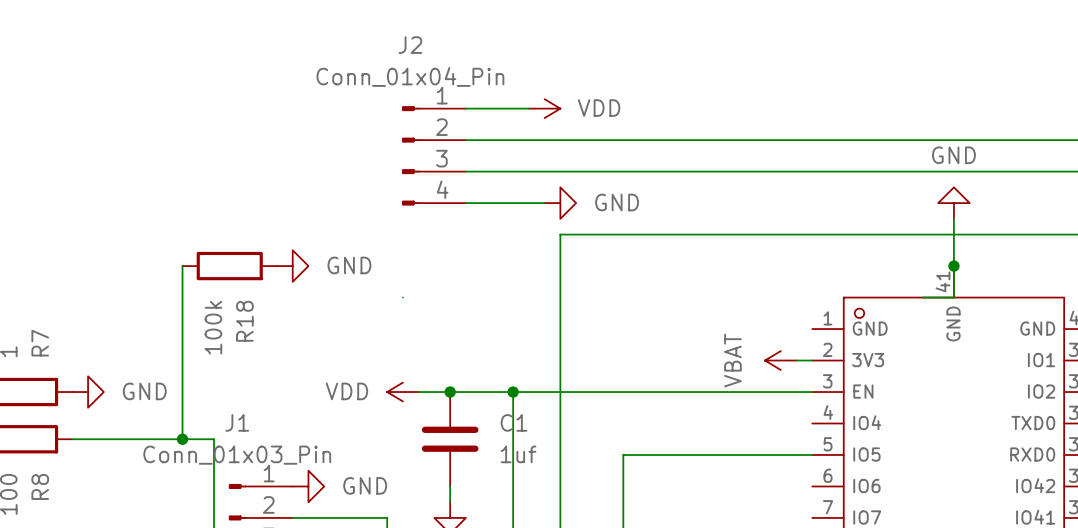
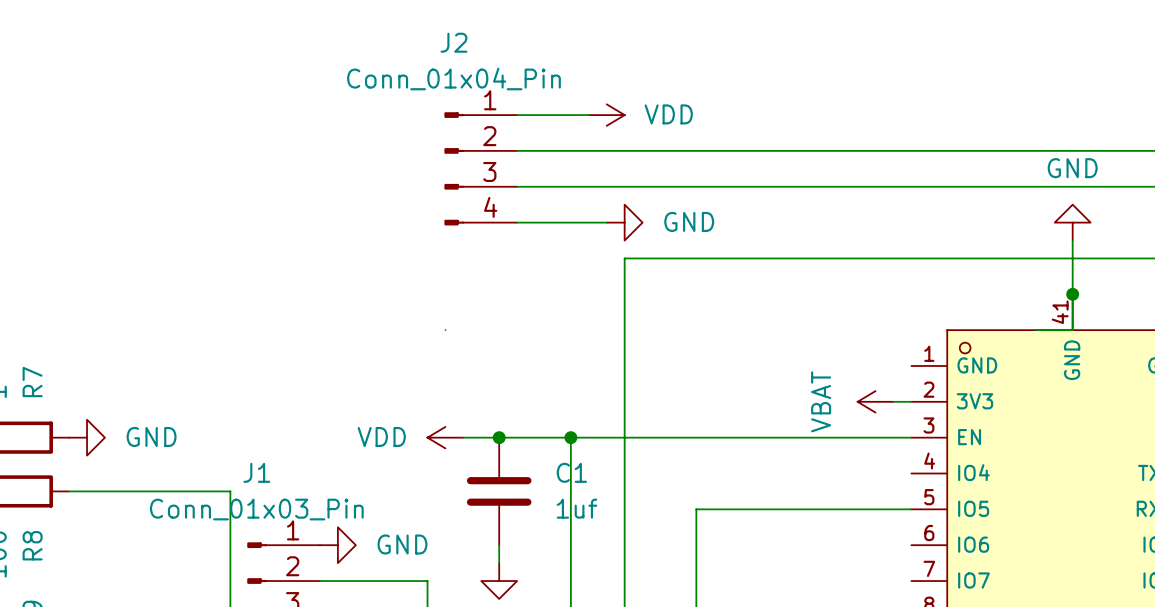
wire: (182, 266) (182, 439) -> none
R18: 100k (229, 266) -> none
power symbol: GND (292, 266) -> none
junction: (182, 439) -> none

